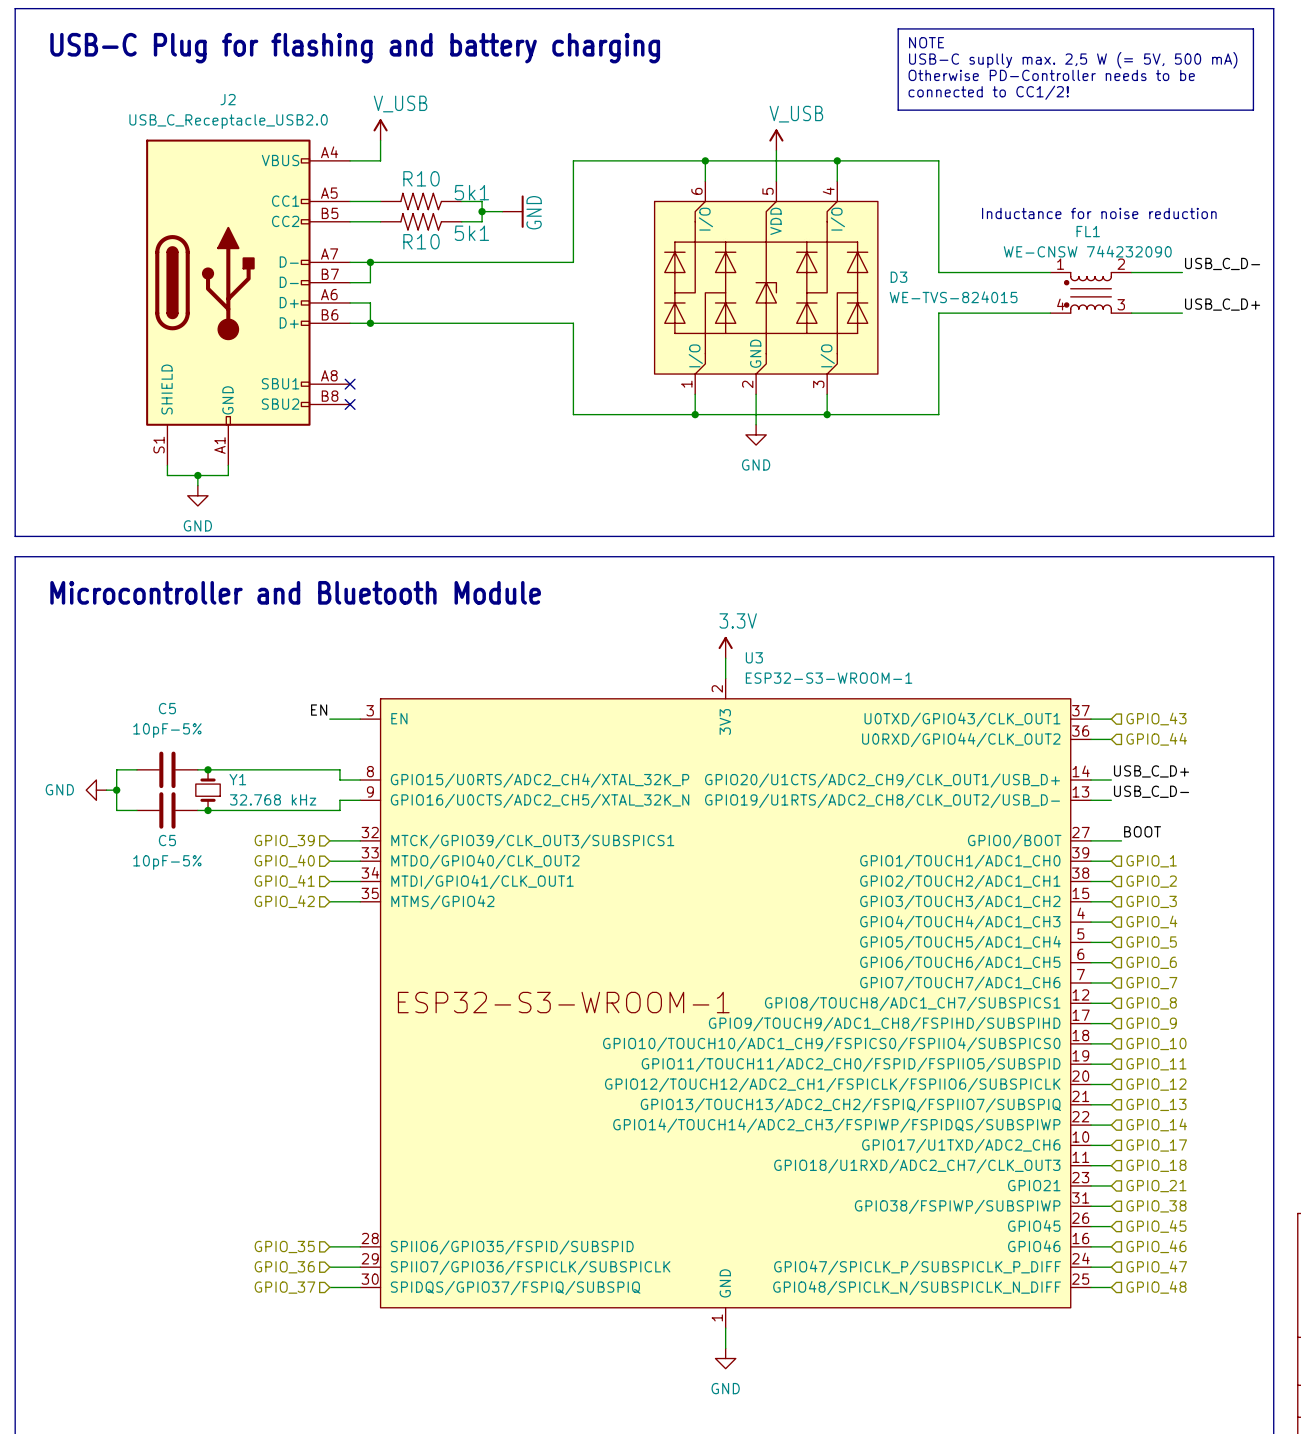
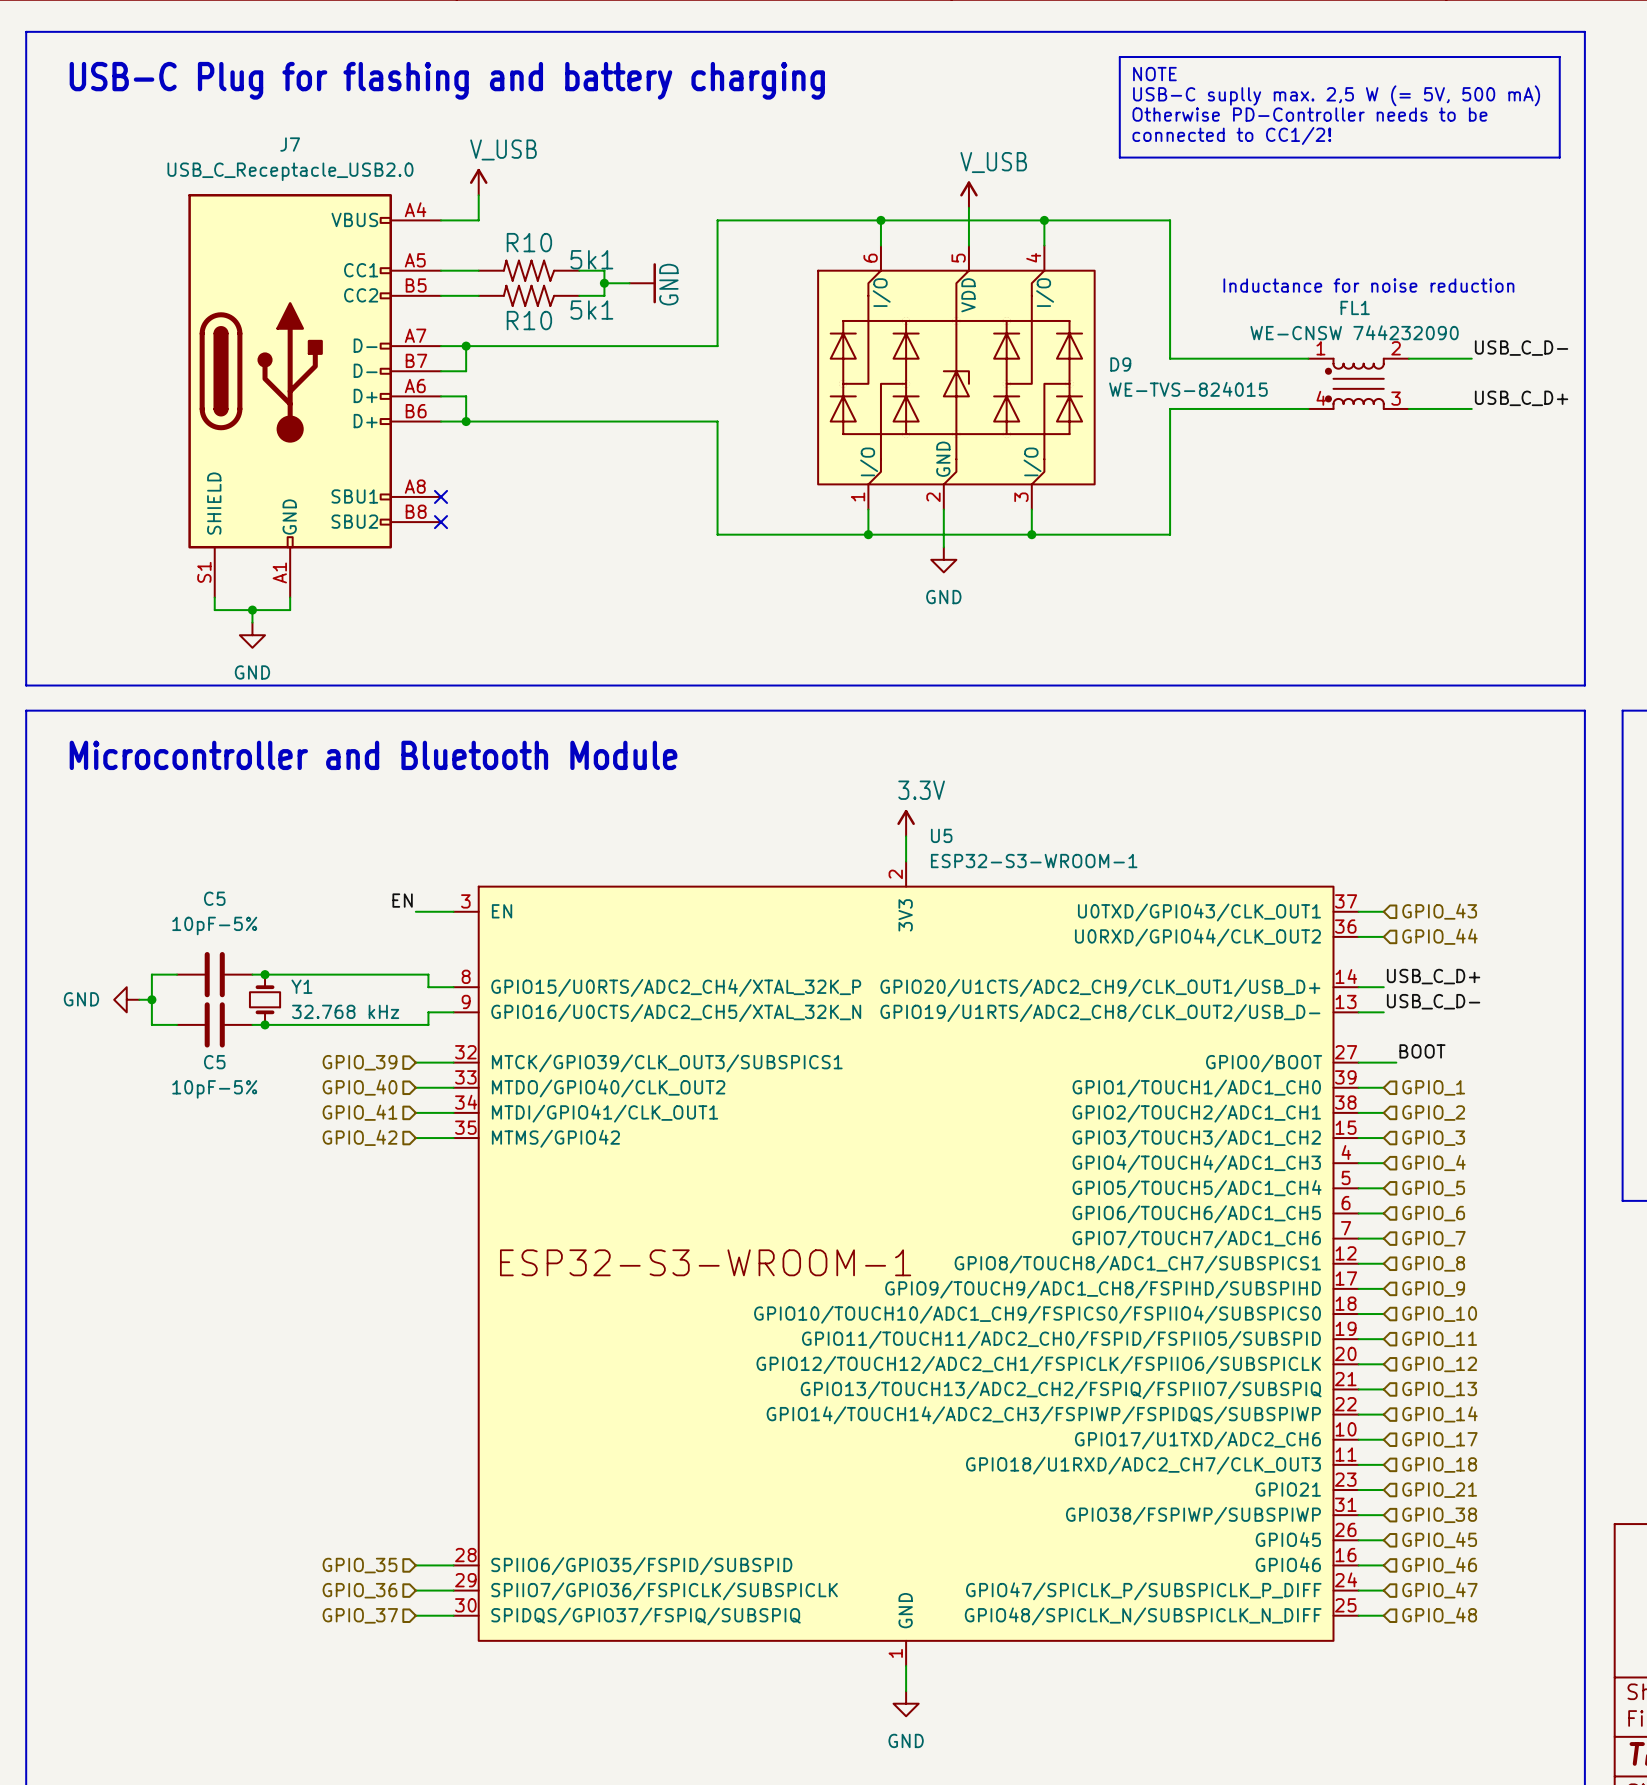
J2 name: J2 (228, 99) -> J7 (290, 144)
D3 name: D3 (898, 277) -> D9 (1120, 364)
U3 name: U3 (754, 657) -> U5 (941, 835)

